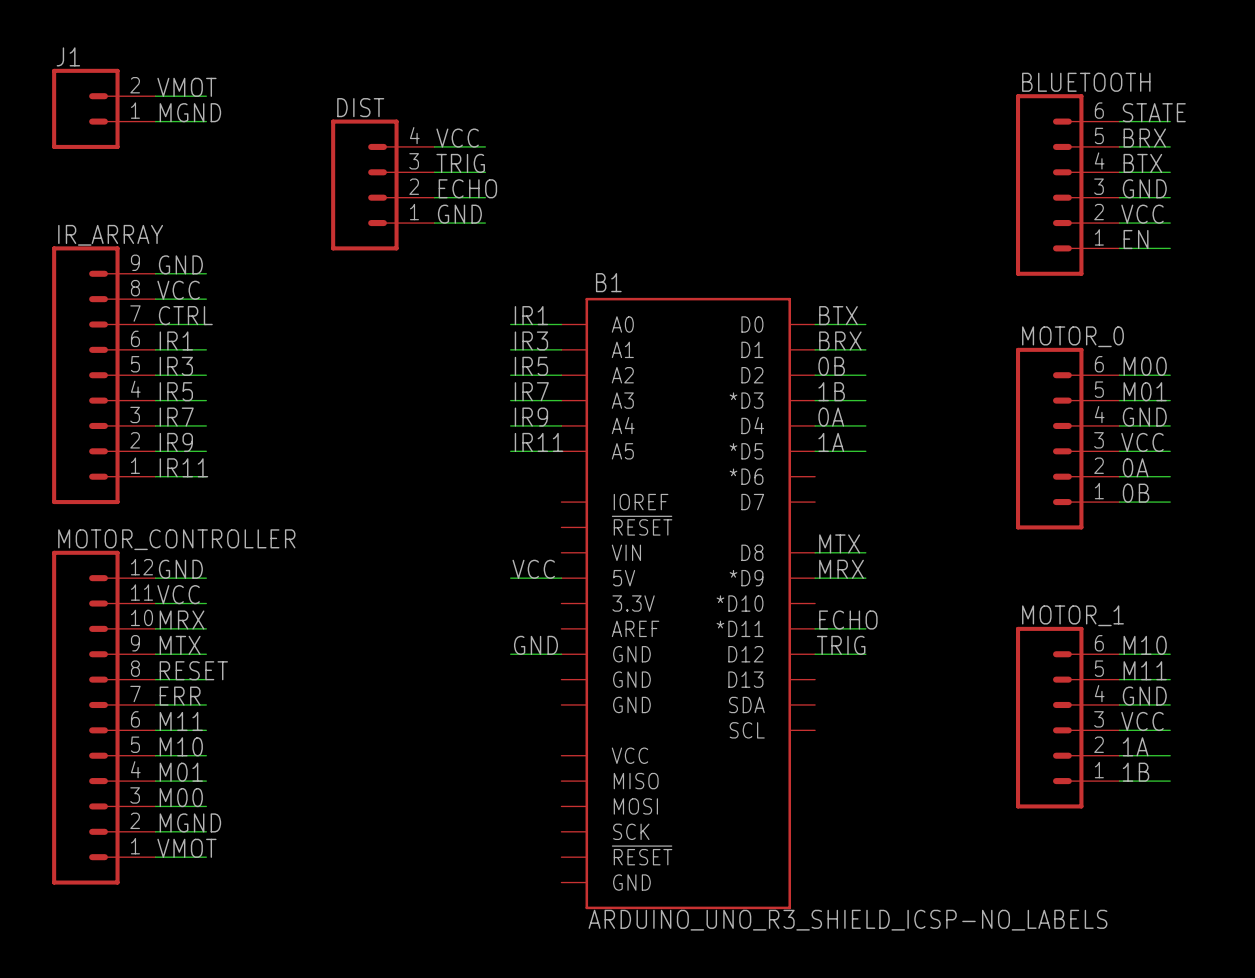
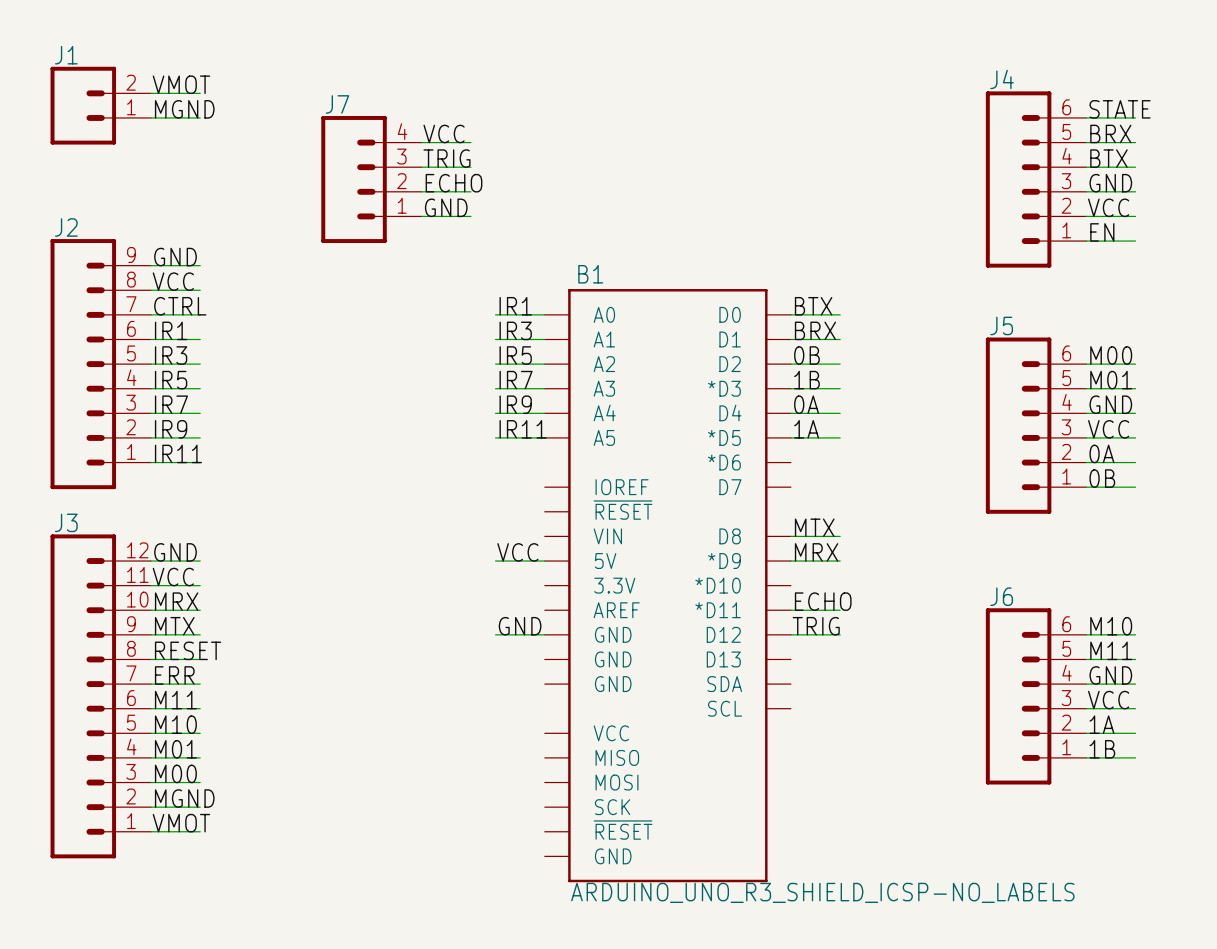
BLUETOOTH name: BLUETOOTH (1086, 82) -> J4 (1002, 79)
DIST name: DIST (360, 107) -> J7 (337, 104)
IR_ARRAY name: IR_ARRAY (110, 235) -> J2 (66, 227)
MOTOR_0 name: MOTOR_0 (1072, 336) -> J5 (1001, 325)
MOTOR_CONTROLLER name: MOTOR_CONTROLLER (176, 539) -> J3 (66, 522)
MOTOR_1 name: MOTOR_1 (1072, 615) -> J6 (1001, 596)

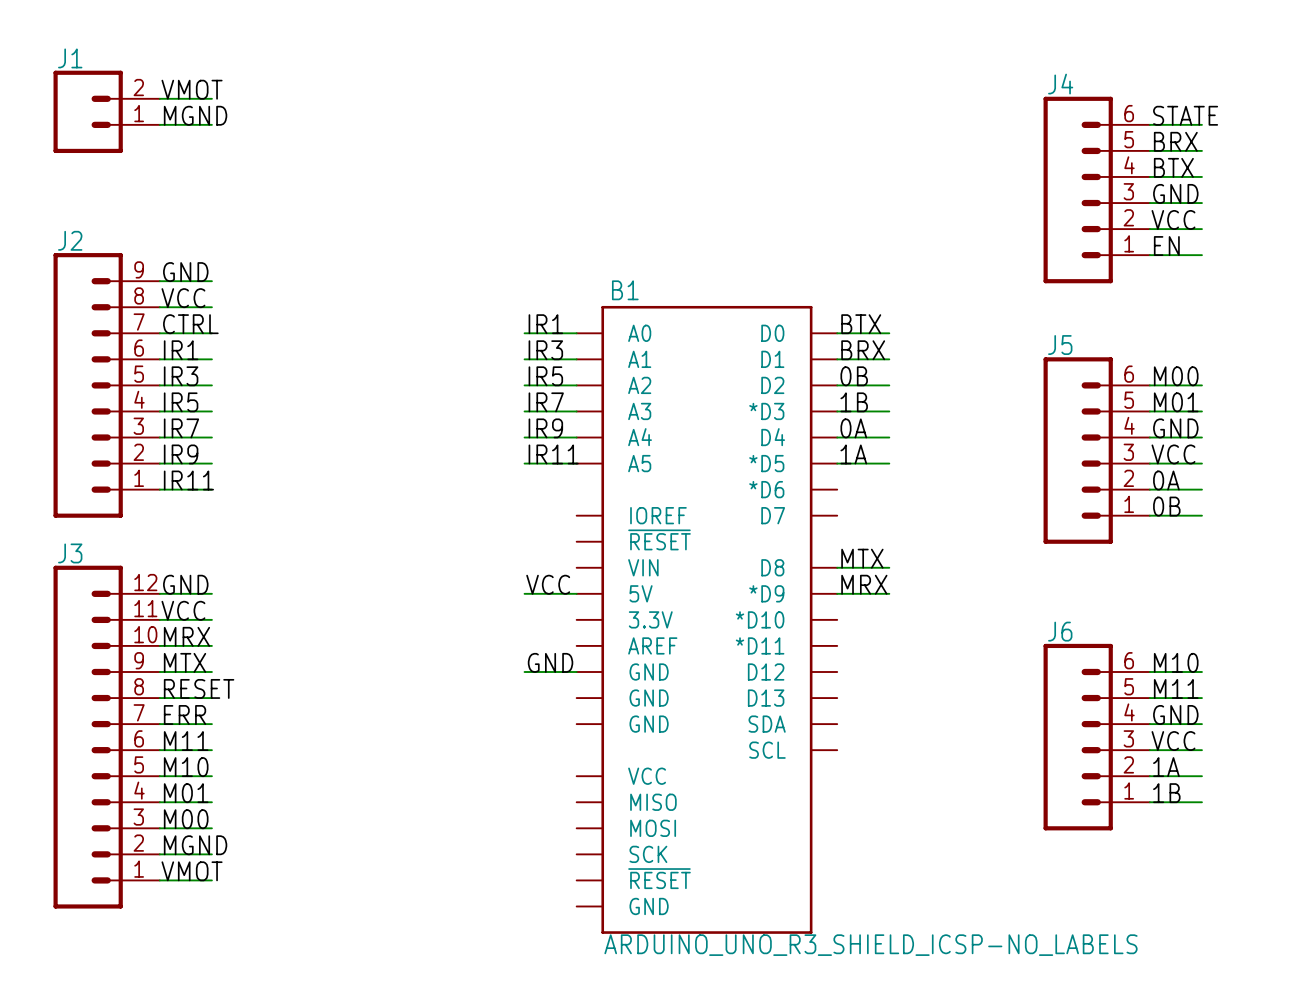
label: VCC (444, 133) -> none
wire: (421, 142) (470, 142) -> none
label: TRIG (447, 158) -> none
wire: (421, 167) (470, 167) -> none
J7: (371, 179) -> none
label: ECHO (454, 183) -> none
wire: (421, 191) (470, 191) -> none
label: GND (446, 207) -> none
wire: (421, 216) (470, 216) -> none
label: ECHO (823, 601) -> none
wire: (790, 610) (840, 610) -> none
label: TRIG (816, 626) -> none
wire: (790, 634) (840, 634) -> none

